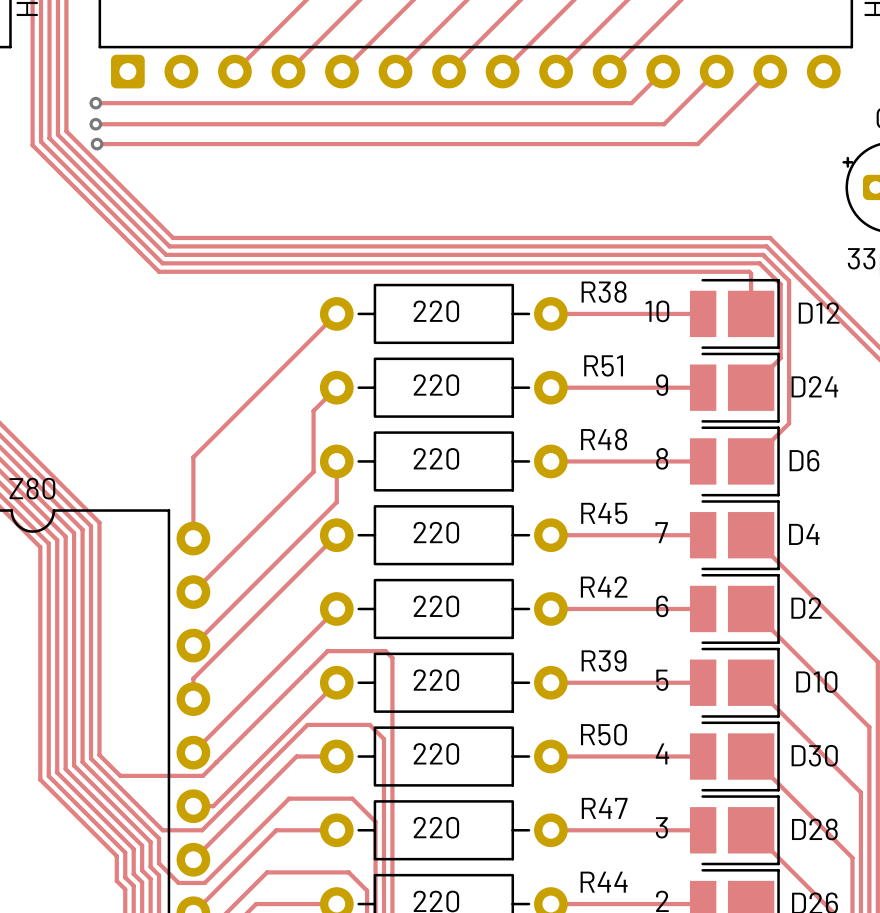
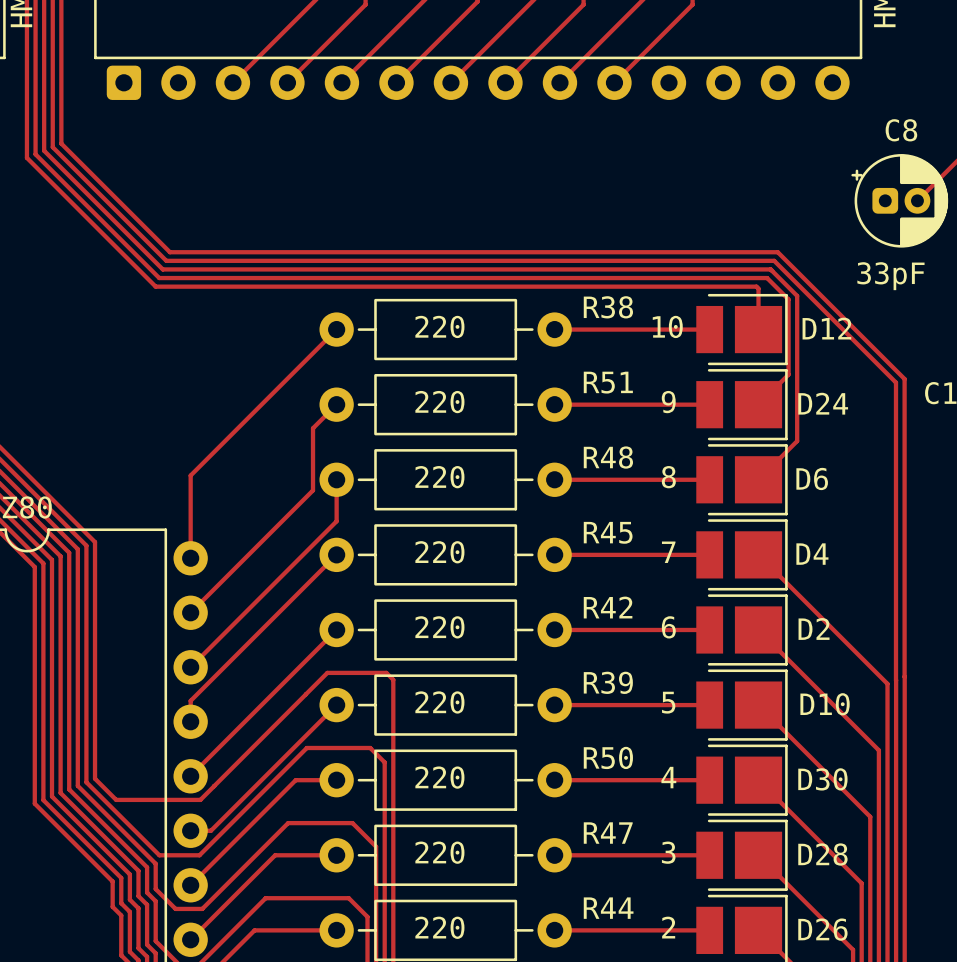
track: (663, 71) (631, 103) (95, 103) -> none
track: (716, 71) (664, 124) (95, 124) -> none
track: (770, 71) (697, 144) (97, 144) -> none
via: (95, 103) -> none
via: (95, 124) -> none
via: (97, 144) -> none

